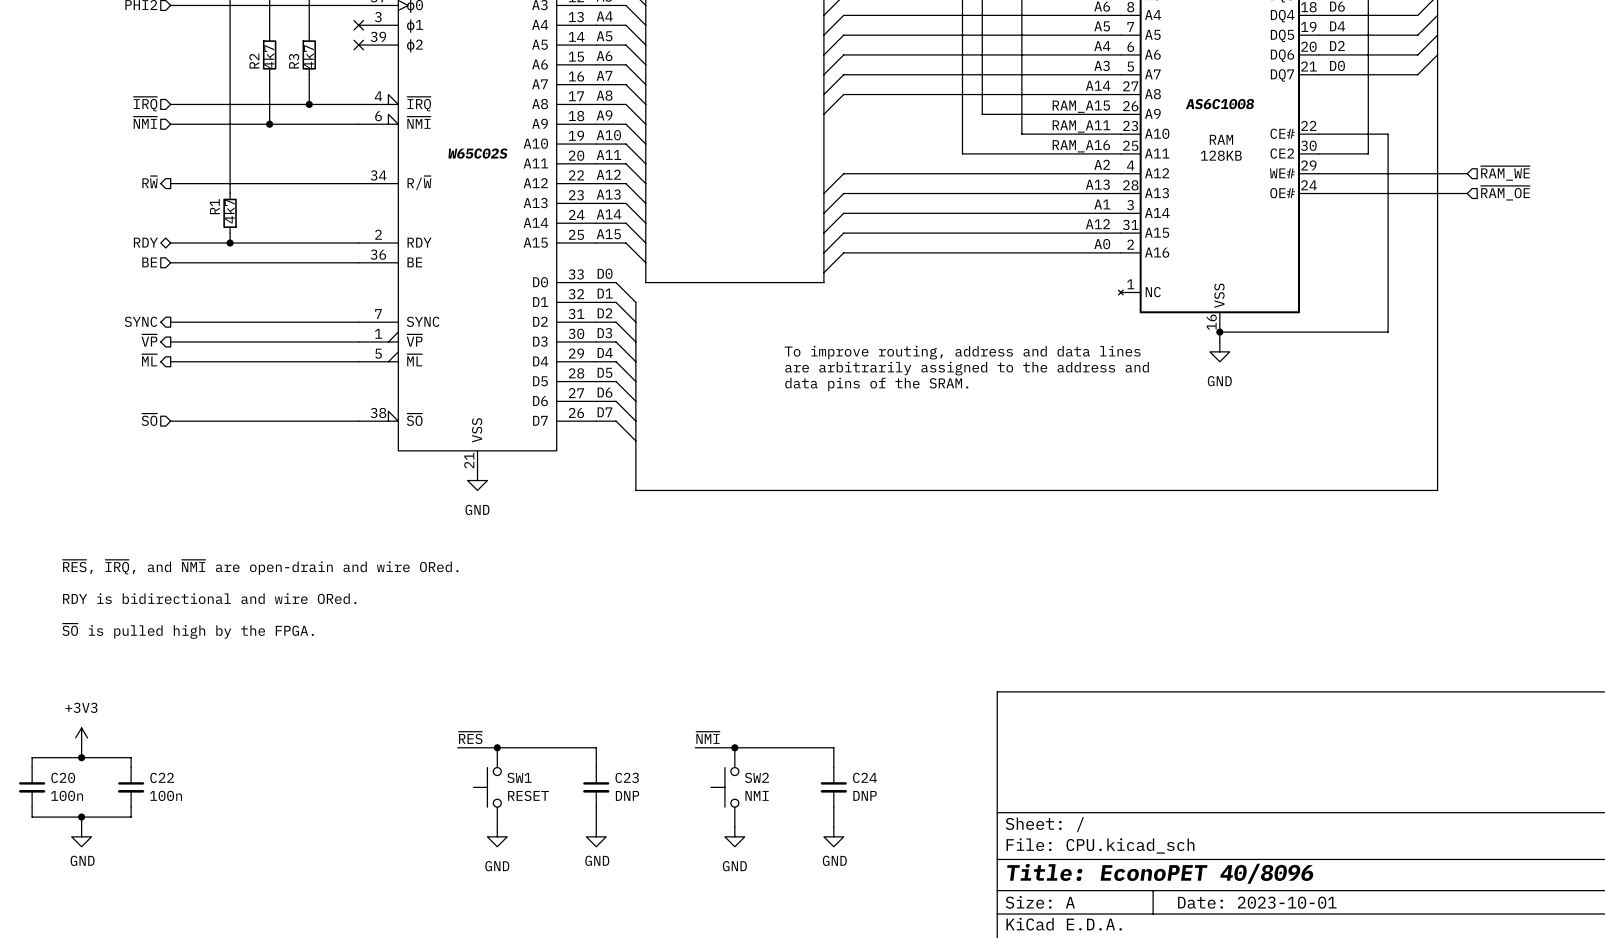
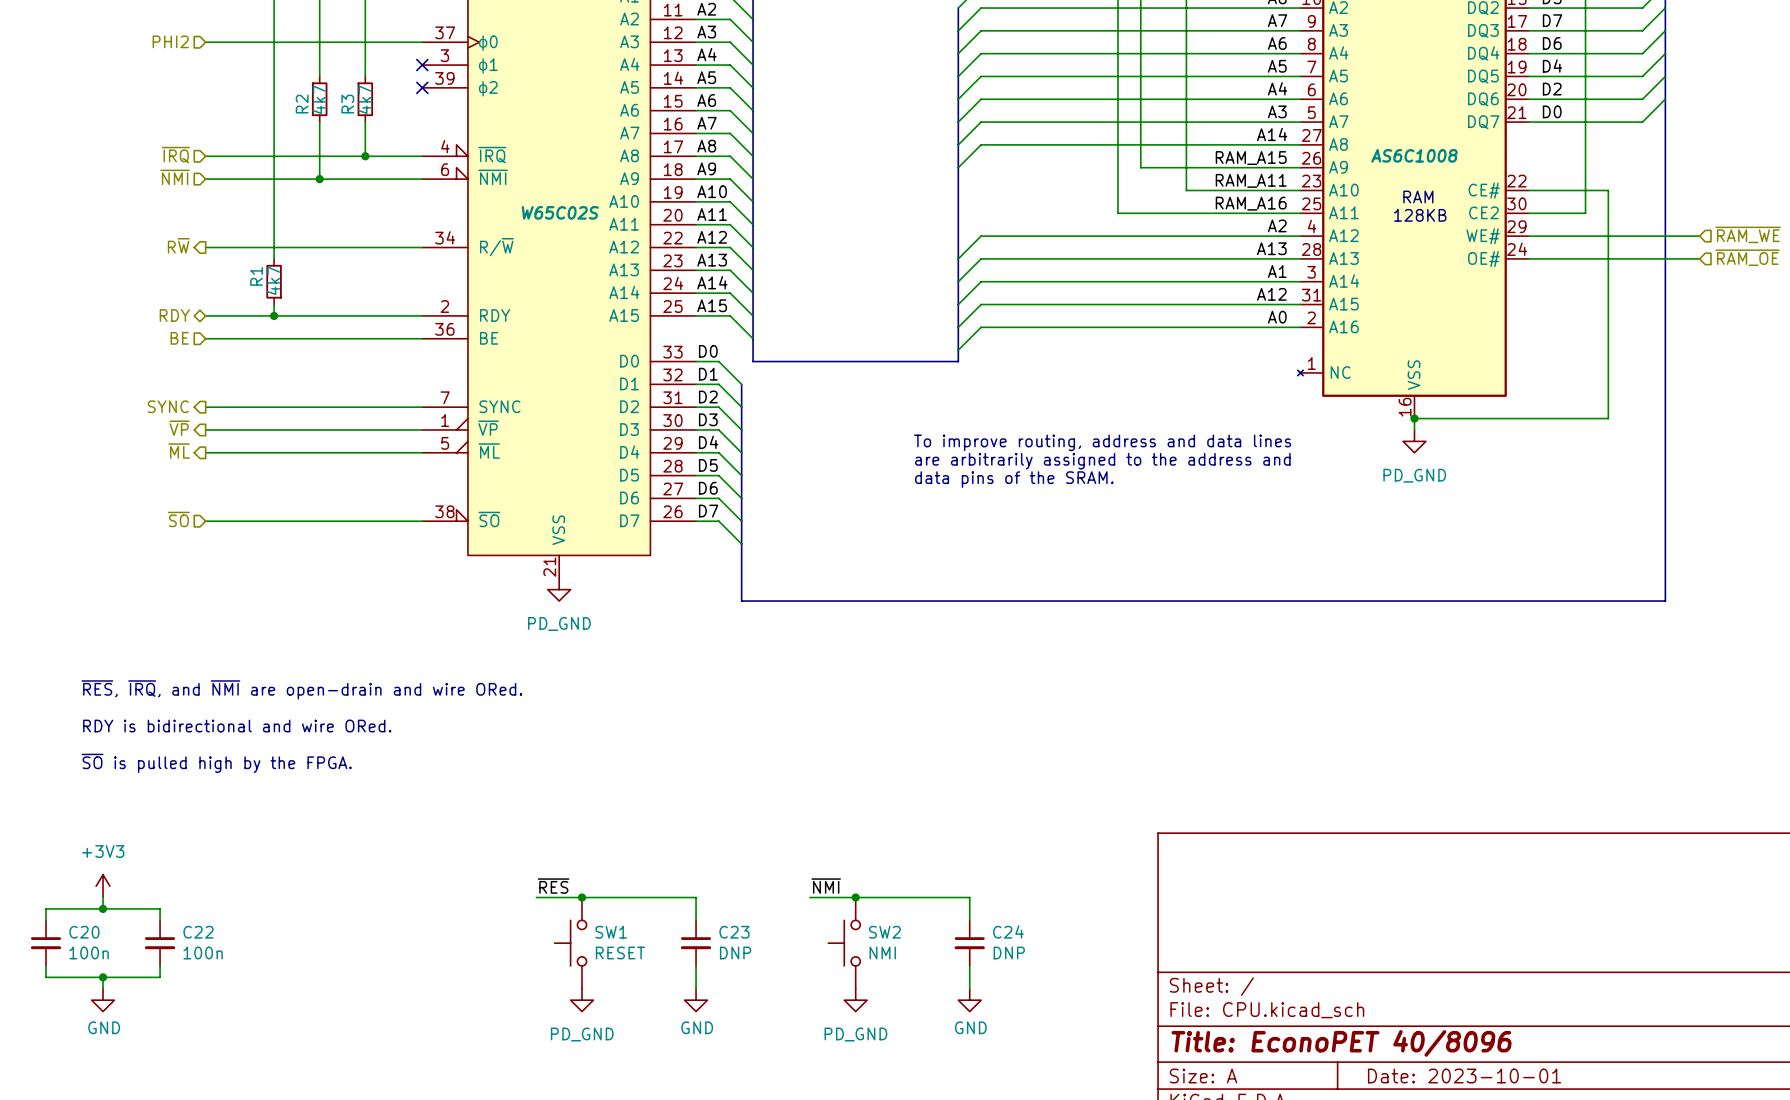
power symbol: GND (1219, 351) -> PD_GND (1414, 441)
power symbol: GND (477, 480) -> PD_GND (559, 589)
power symbol: GND (497, 836) -> PD_GND (581, 1000)
power symbol: GND (734, 836) -> PD_GND (855, 1000)

